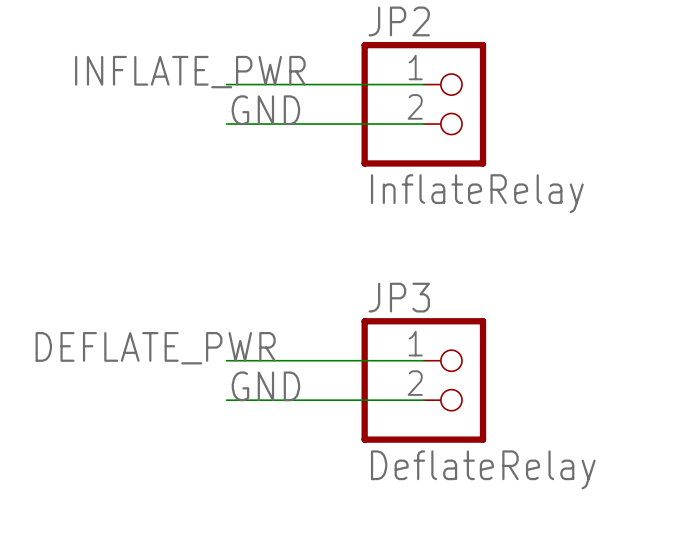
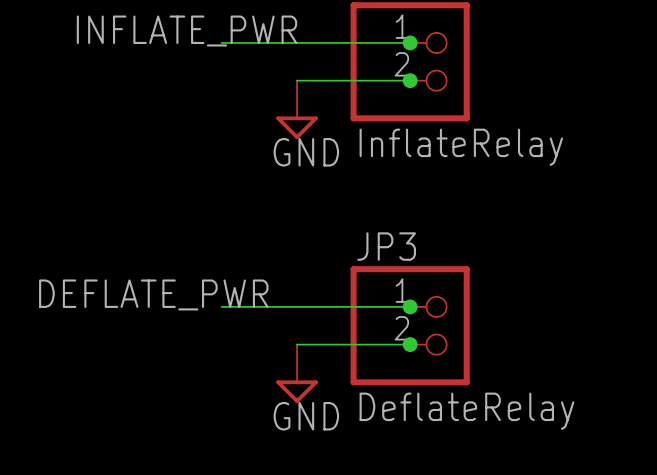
junction: none -> (410, 42)
label: GND (265, 110) -> none
wire: (226, 124) (305, 124) -> none
junction: none -> (410, 80)
power symbol: none -> GND (297, 109)
junction: none -> (410, 306)
label: GND (265, 386) -> none
wire: (226, 400) (305, 400) -> none
junction: none -> (410, 344)
power symbol: none -> GND (297, 373)

